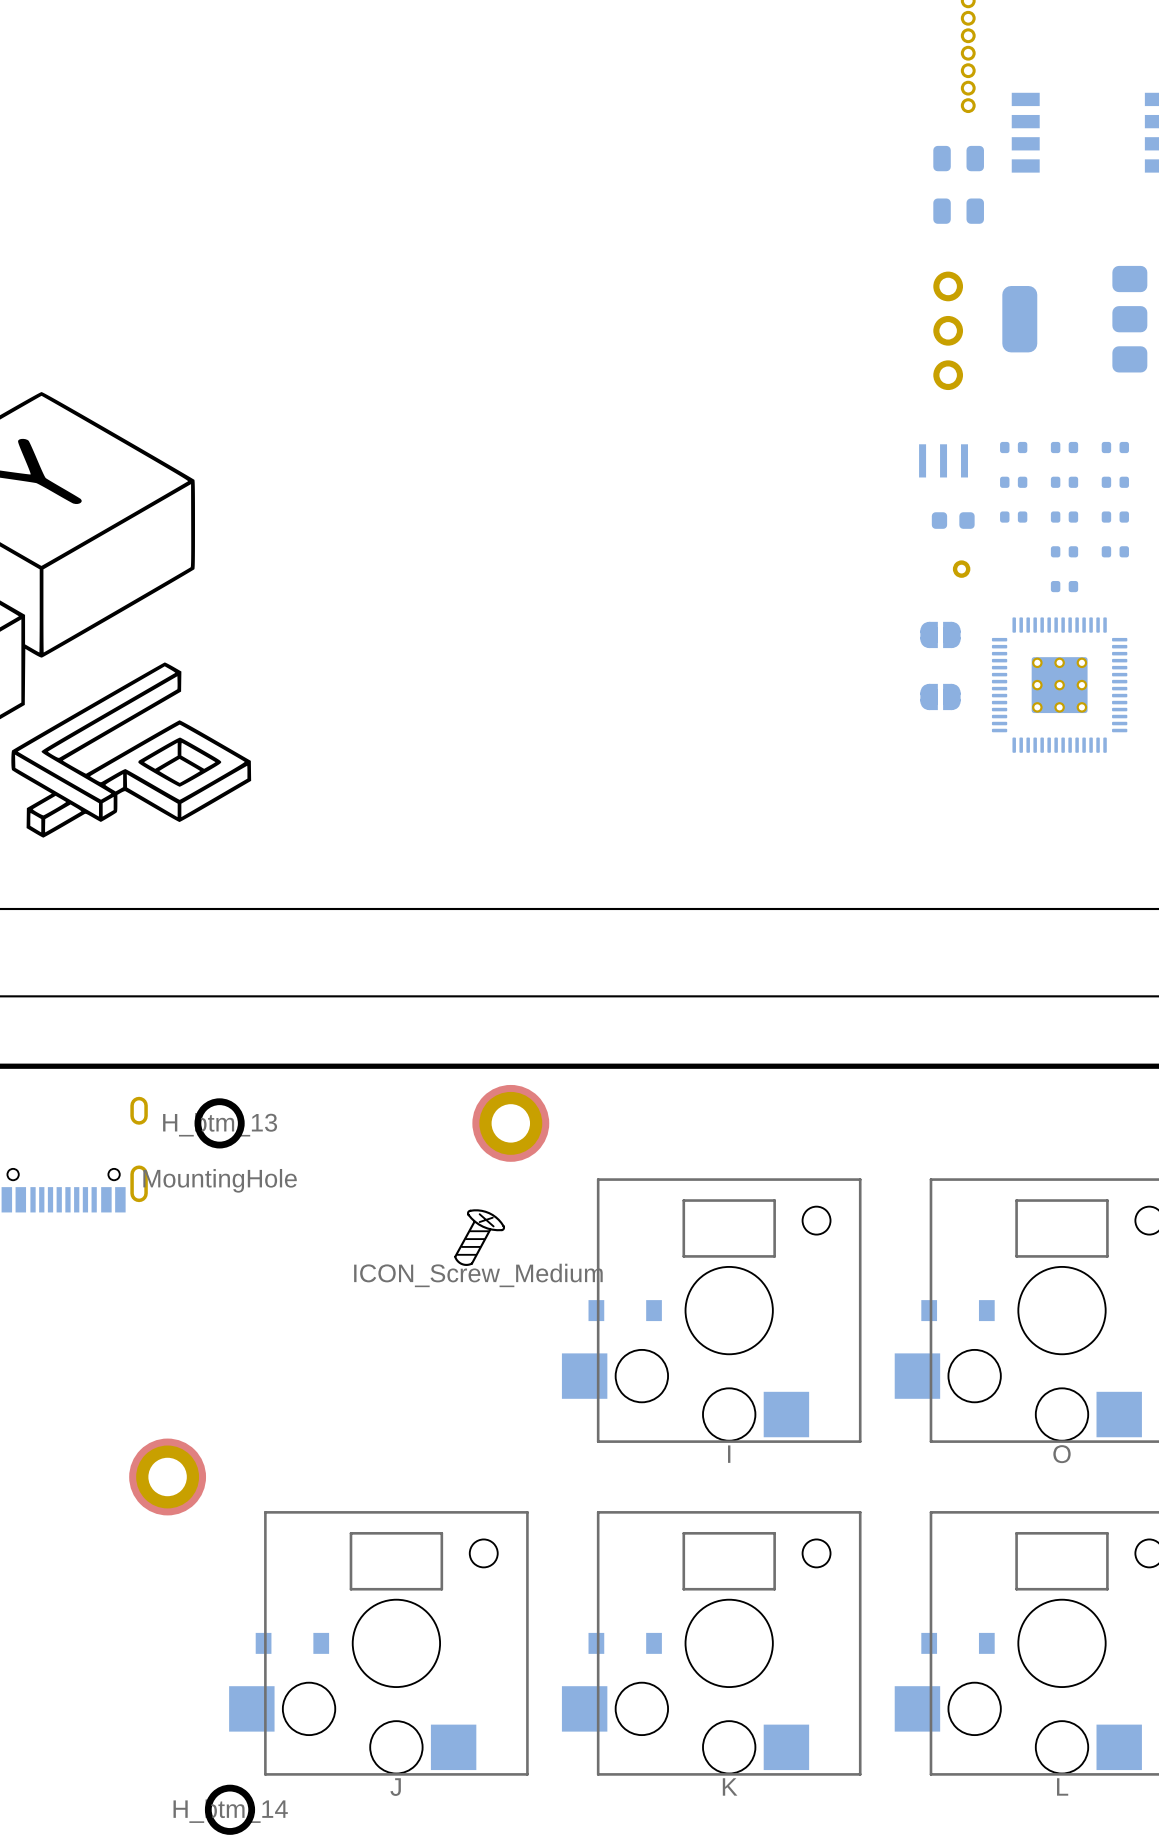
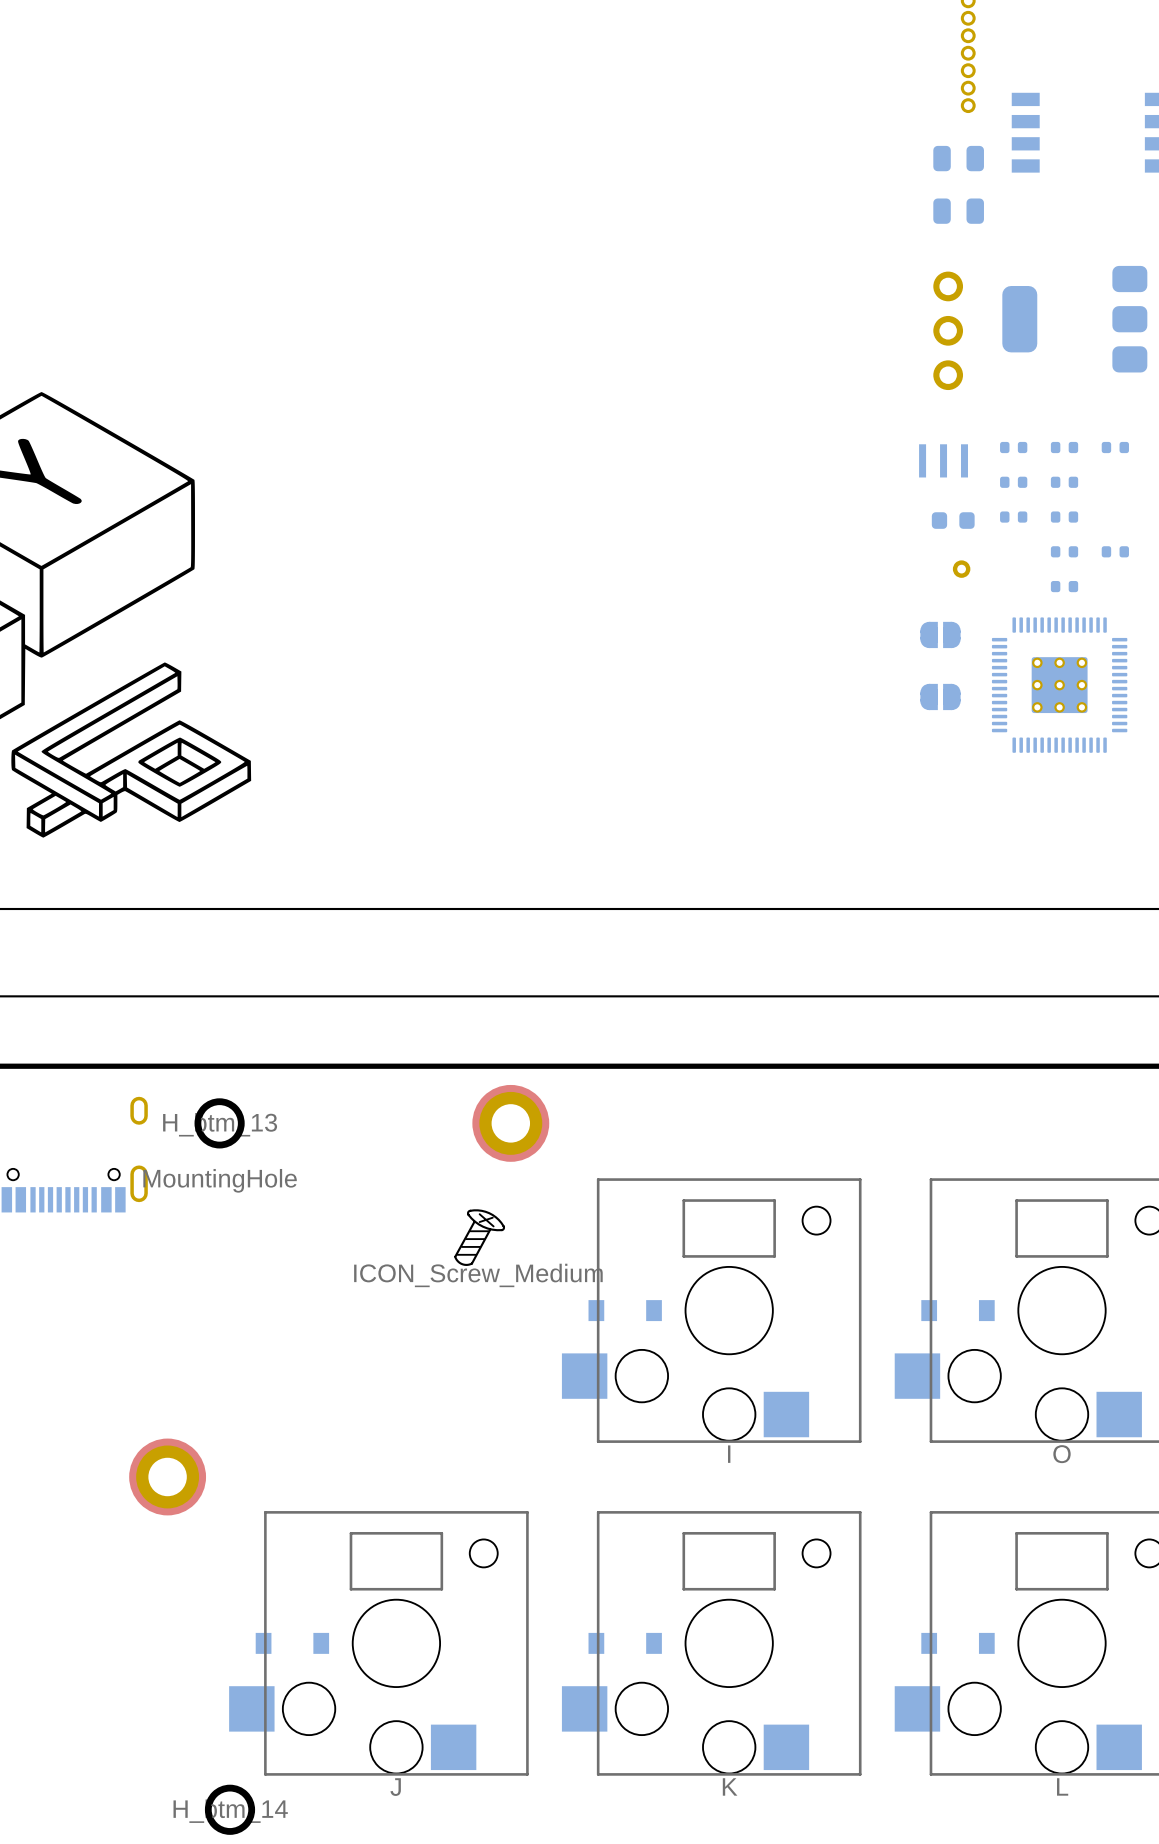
part: (1115, 482) -> none
part: (1115, 517) -> none

